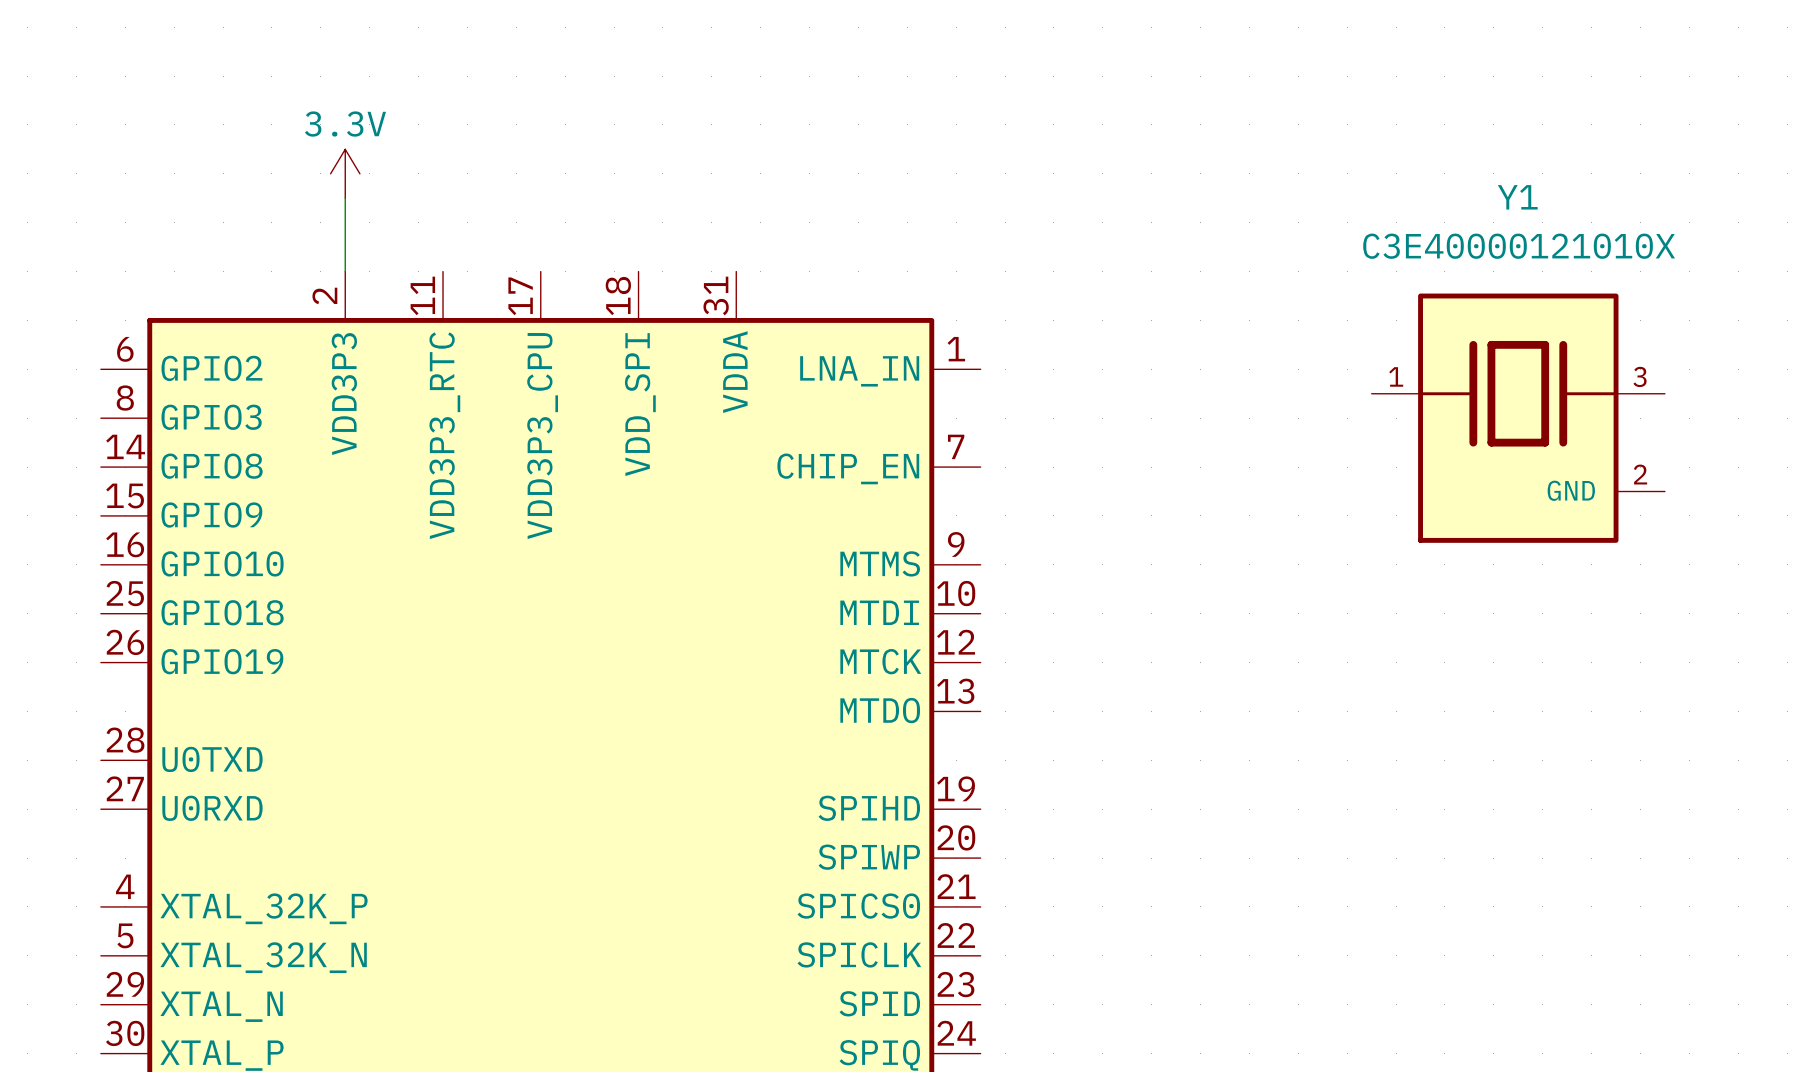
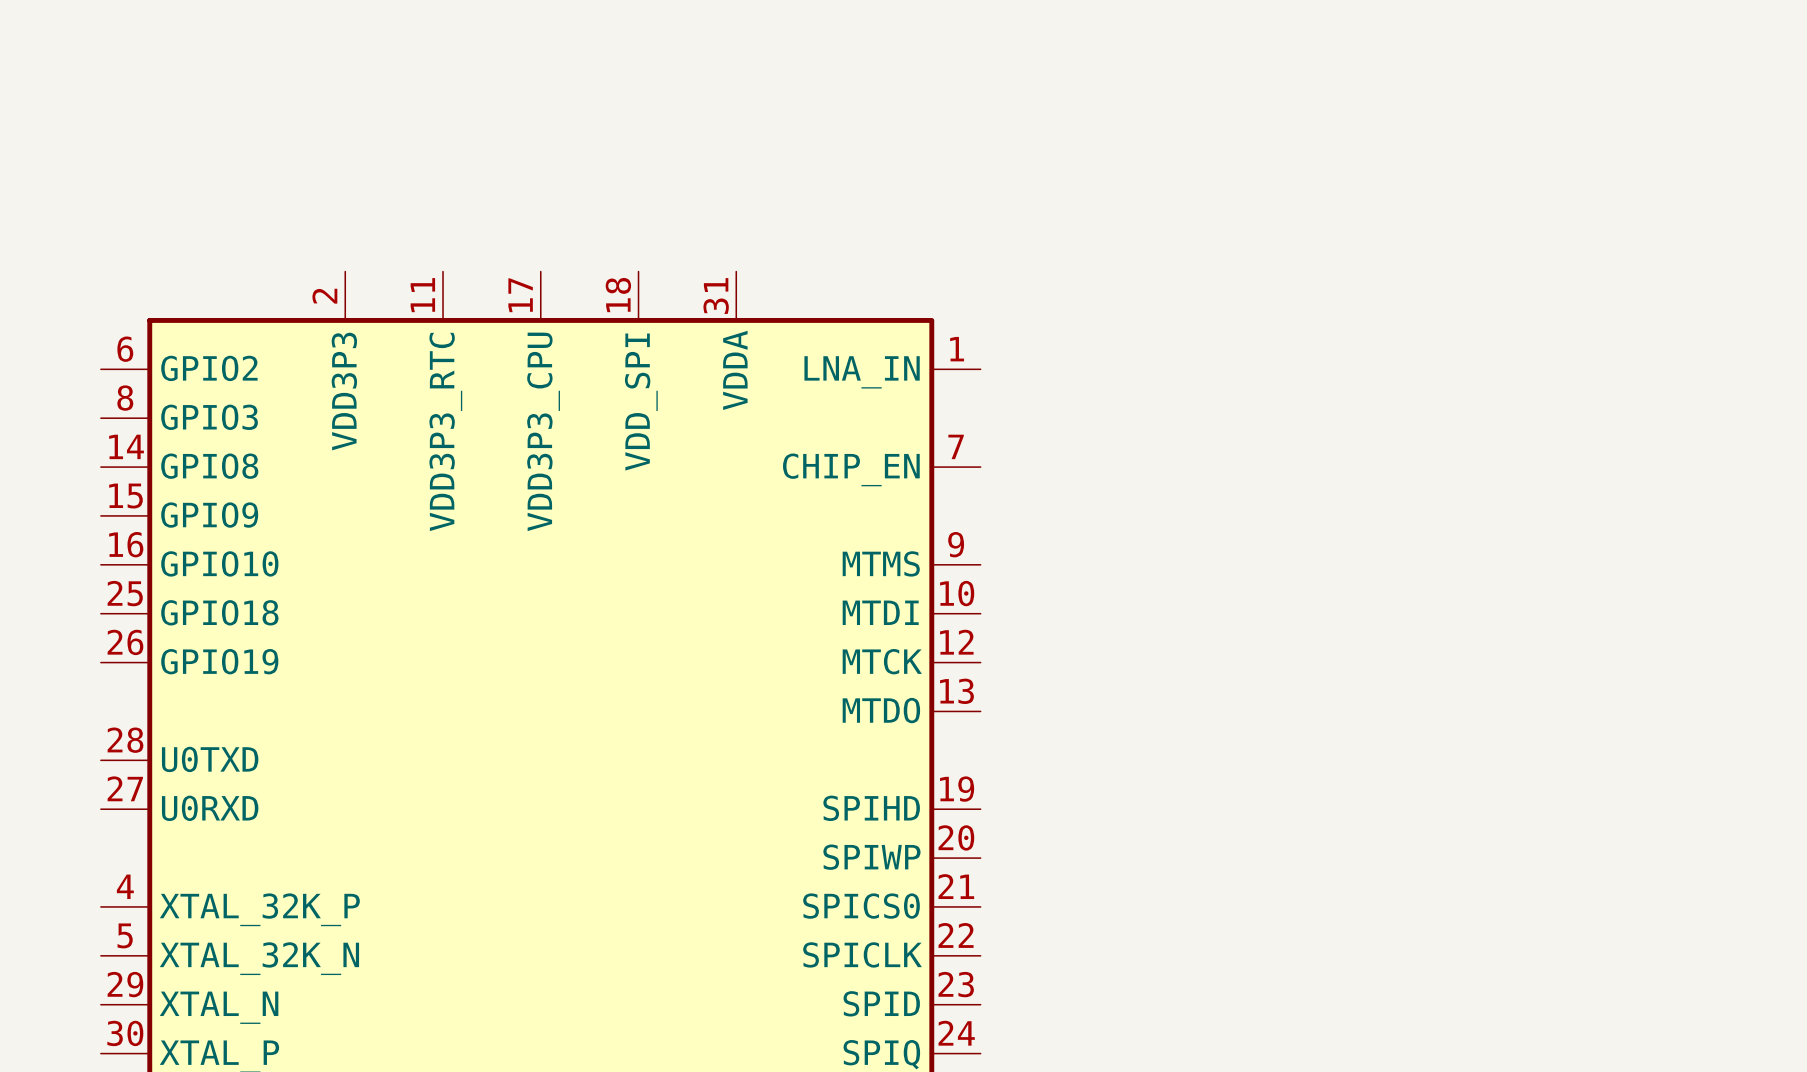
power symbol: 3.3V (345, 173) -> none
wire: (345, 198) (345, 271) -> none
Y1: C3E40000121010X (1518, 418) -> none

